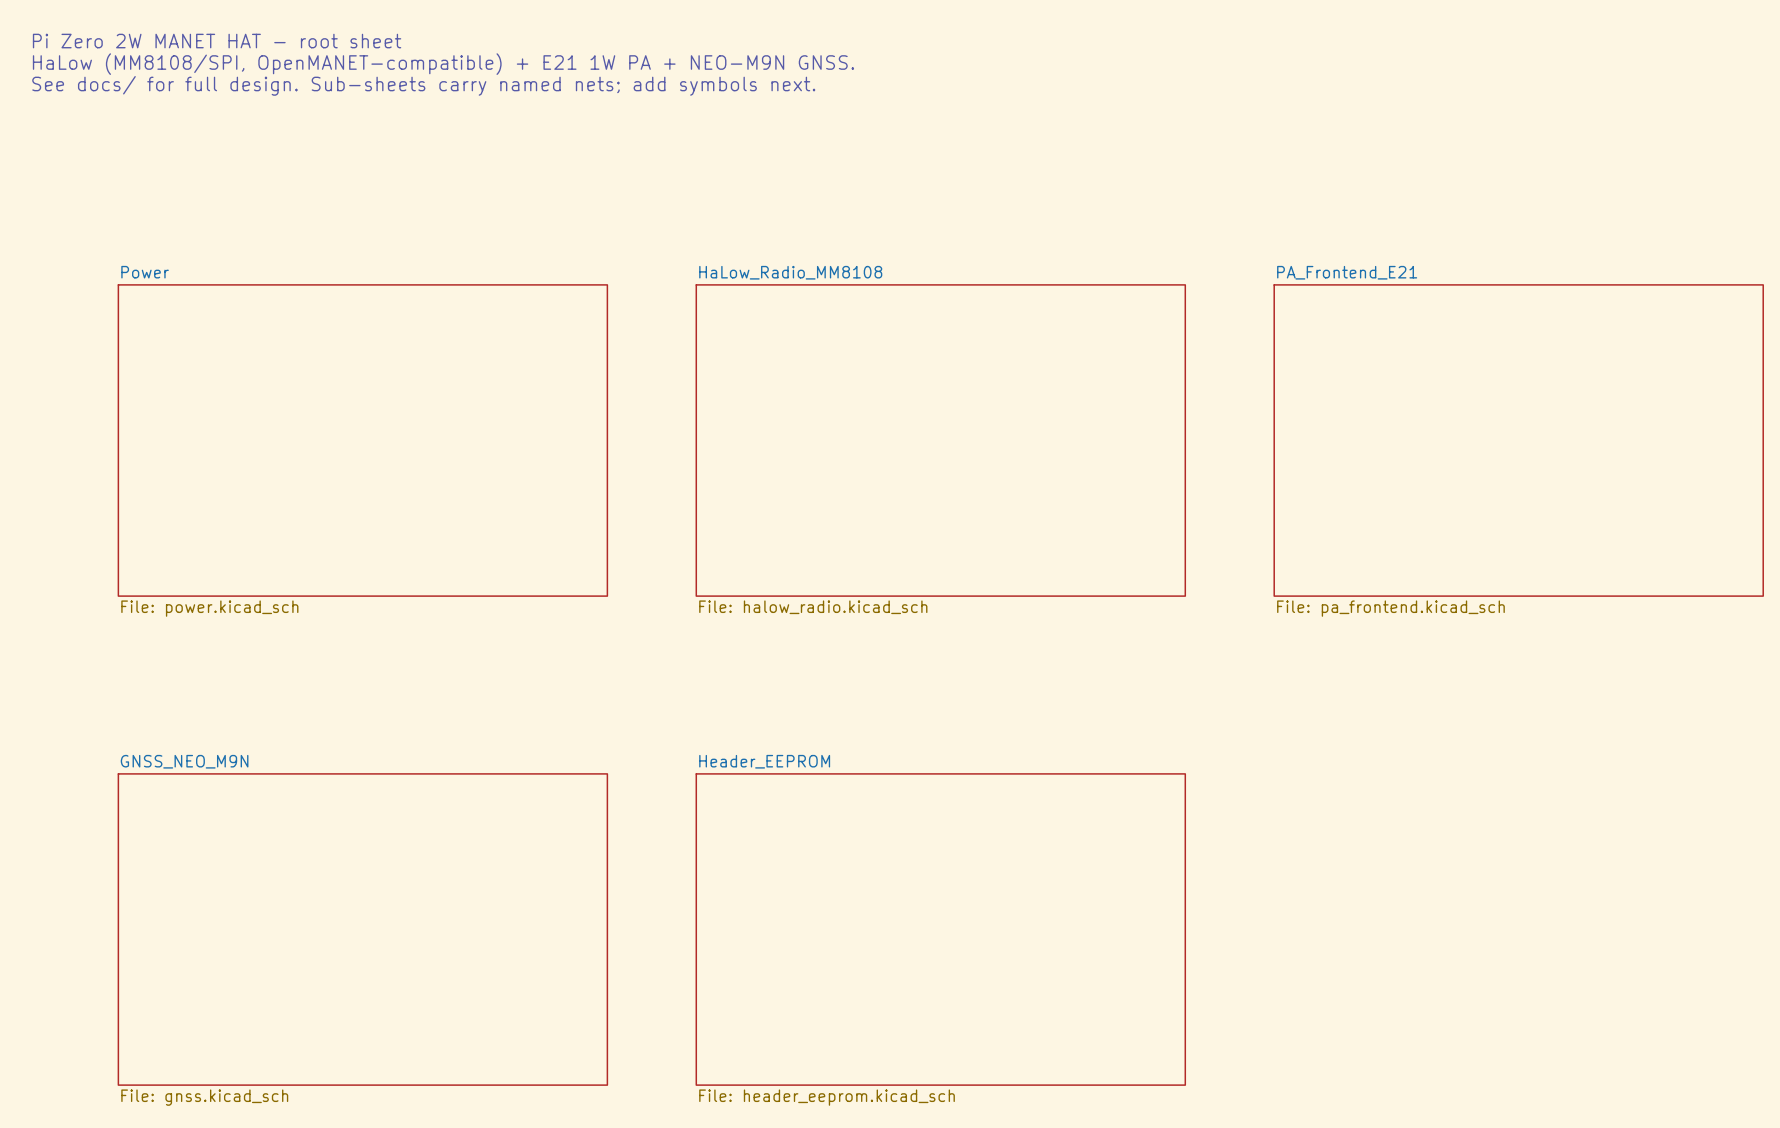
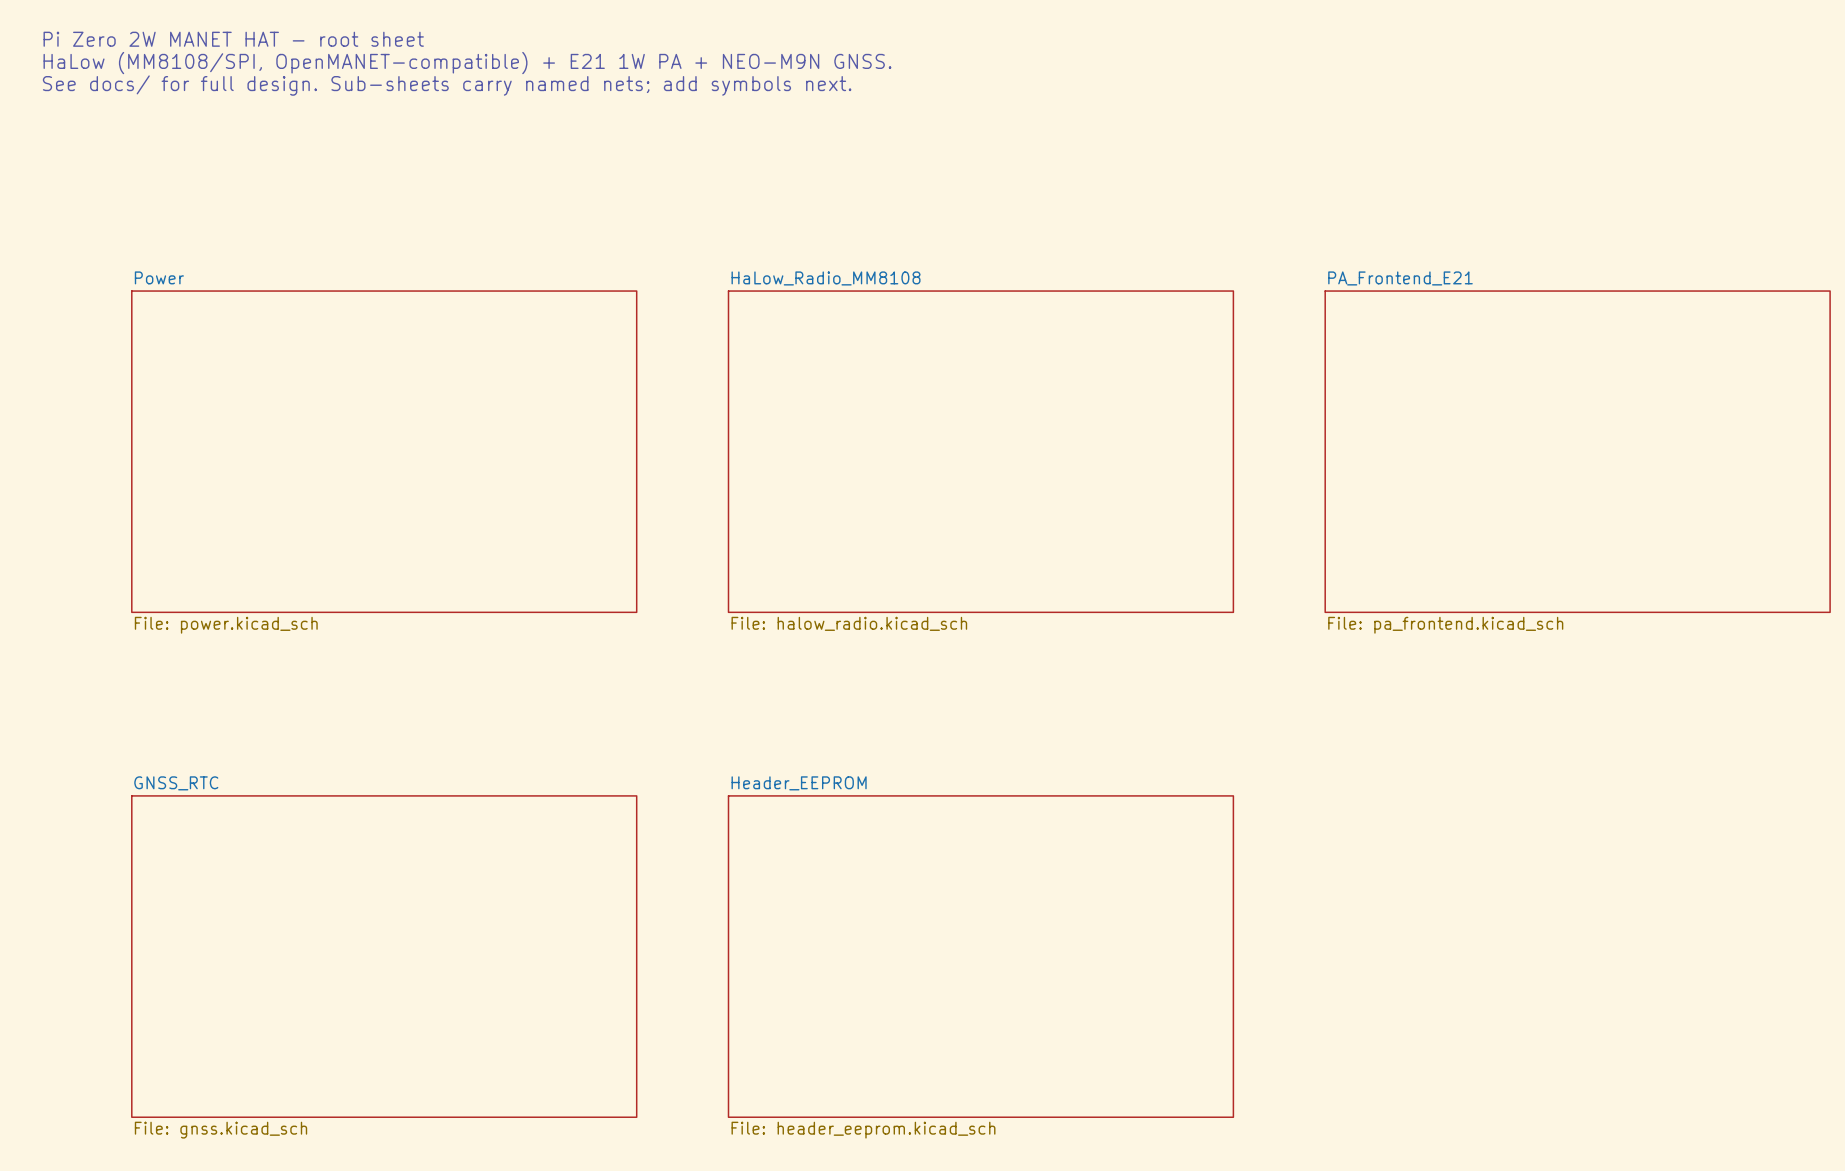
sheet GNSS_NEO_M9N name: GNSS_NEO_M9N (184, 761) -> GNSS_RTC (176, 783)

